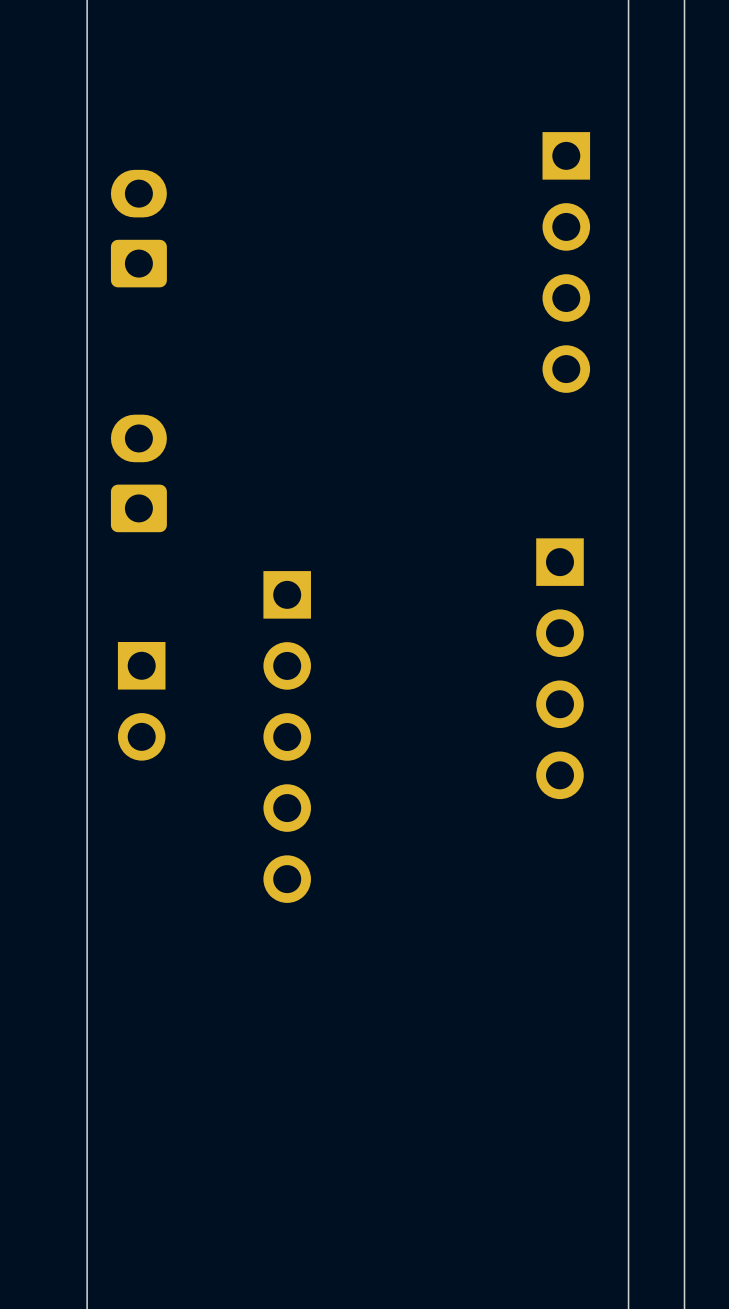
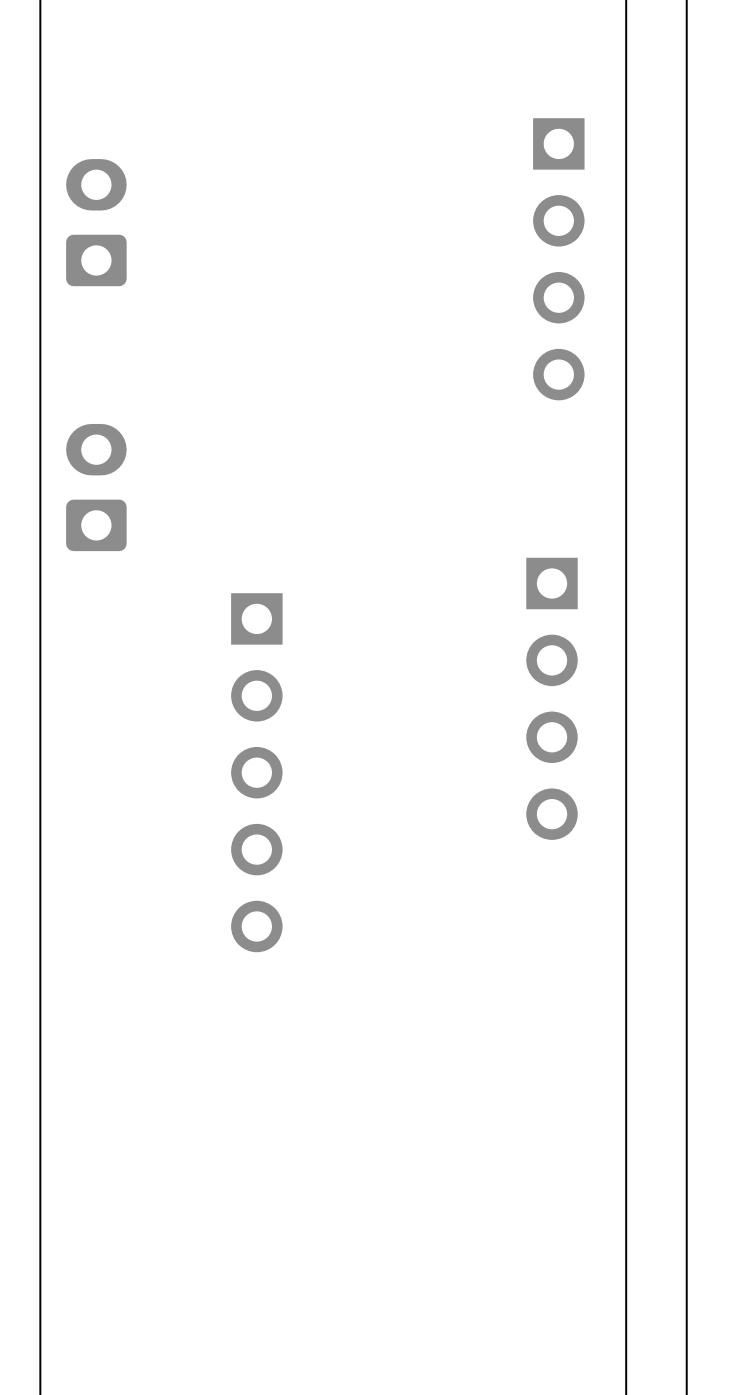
part: (141, 701) -> none

